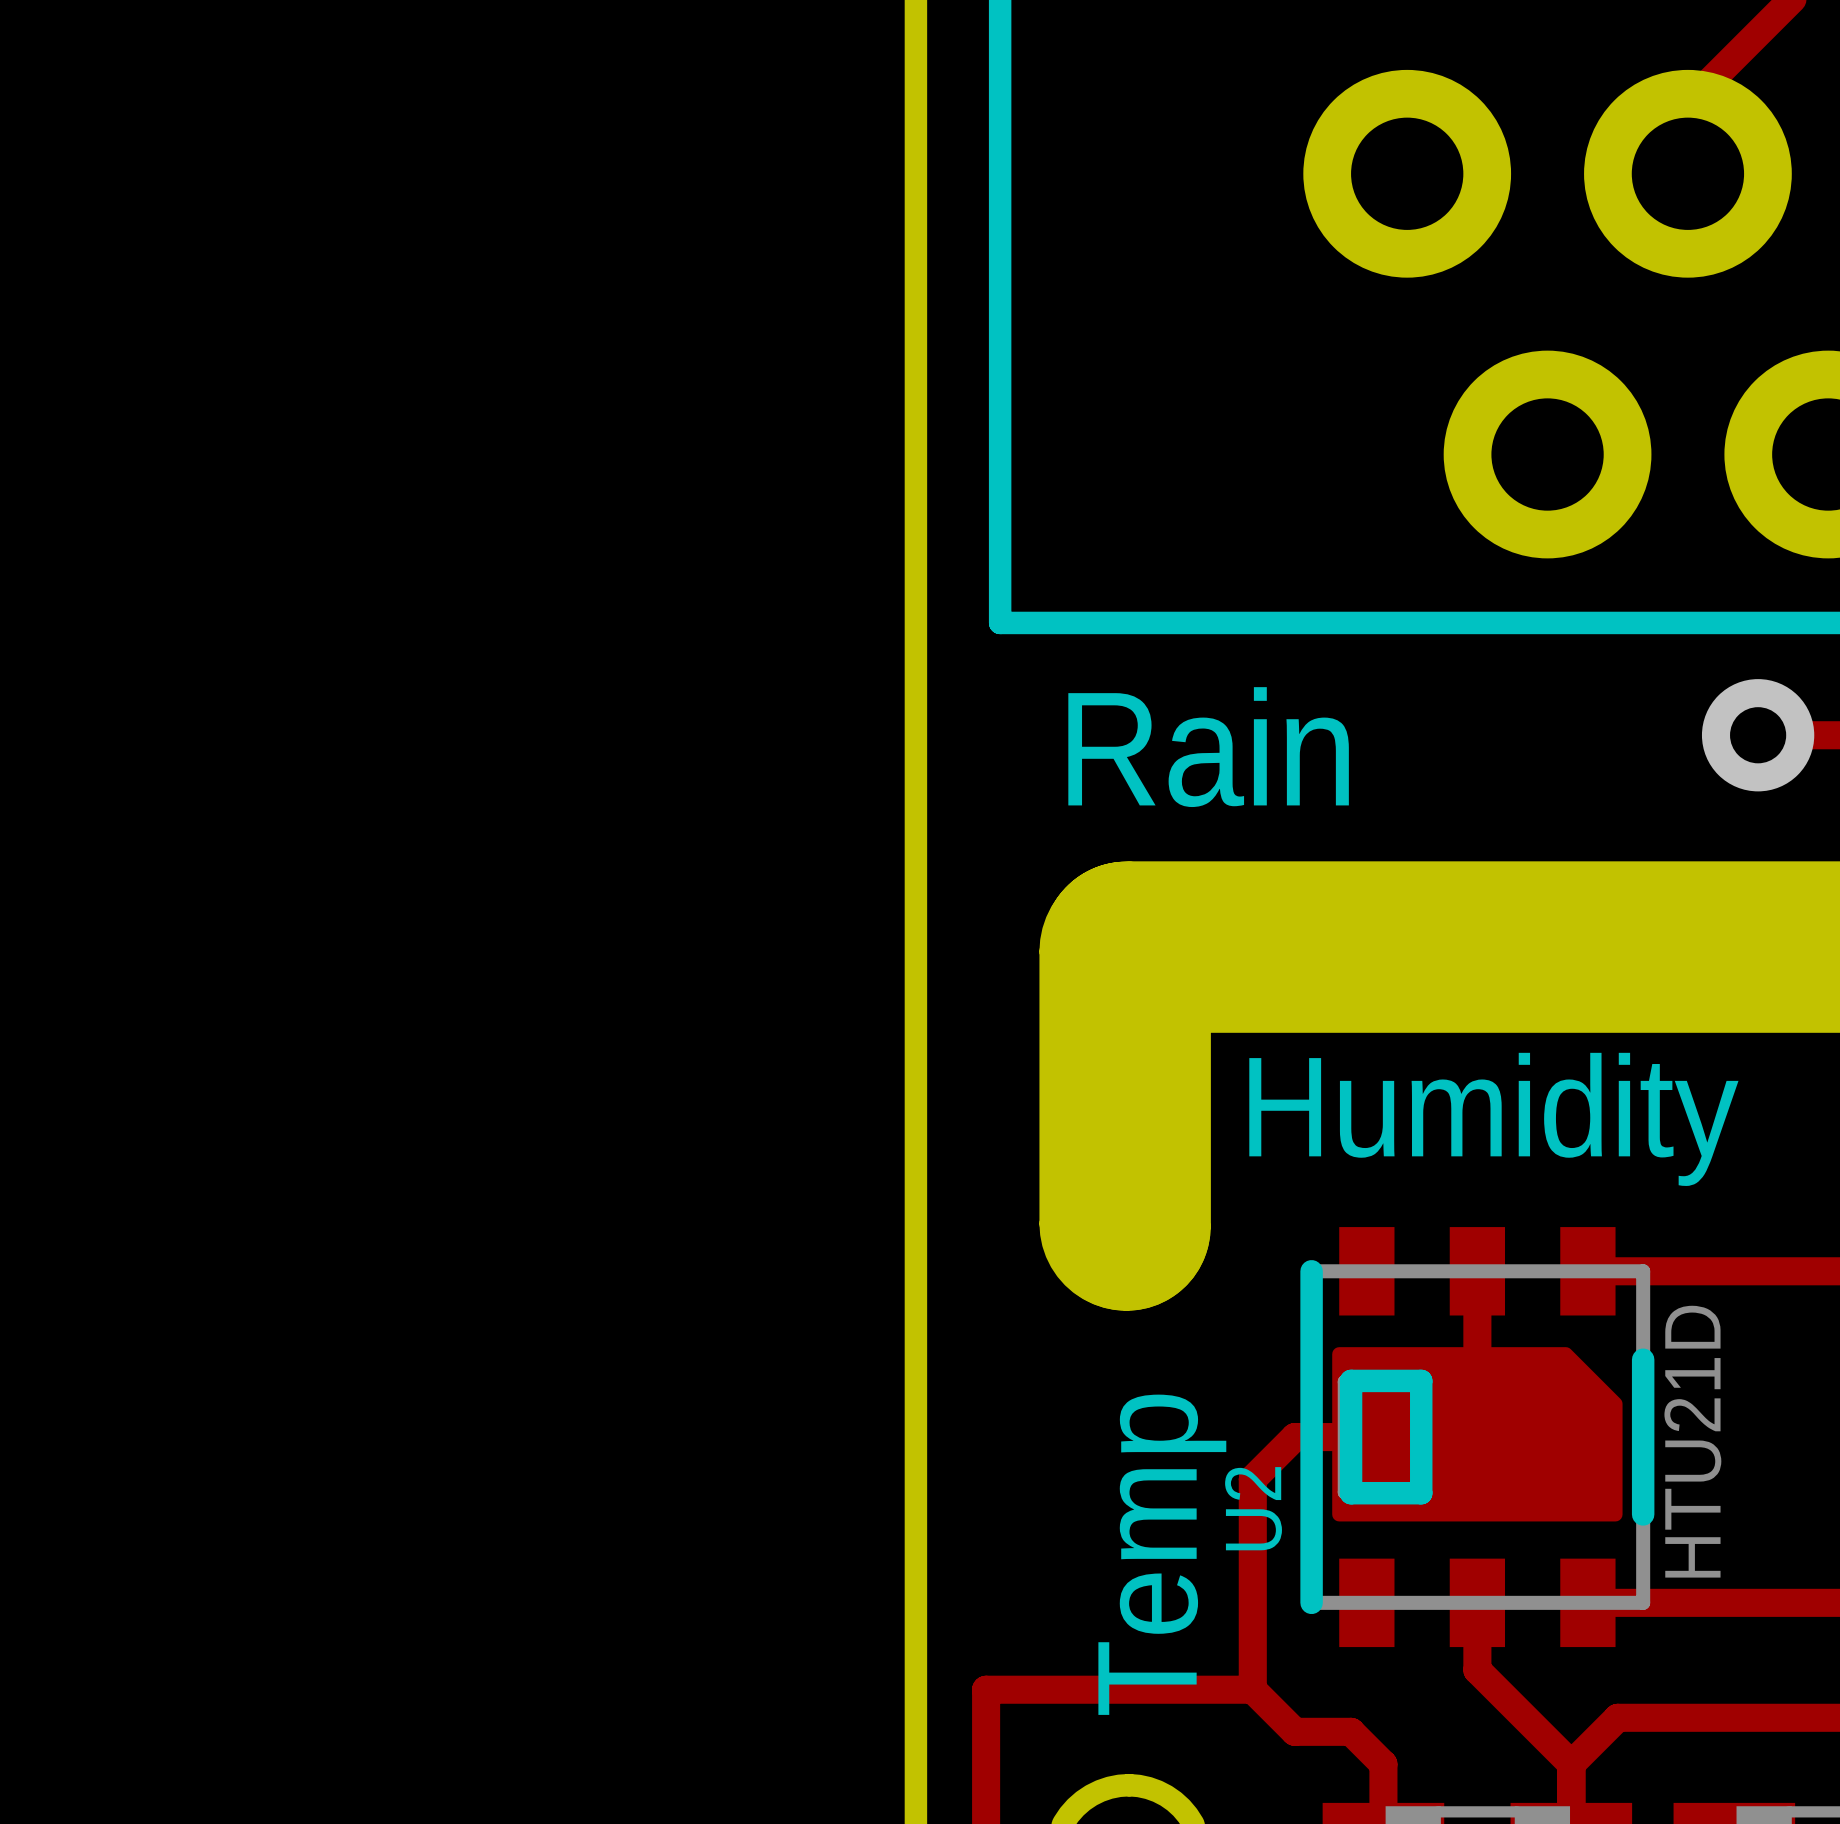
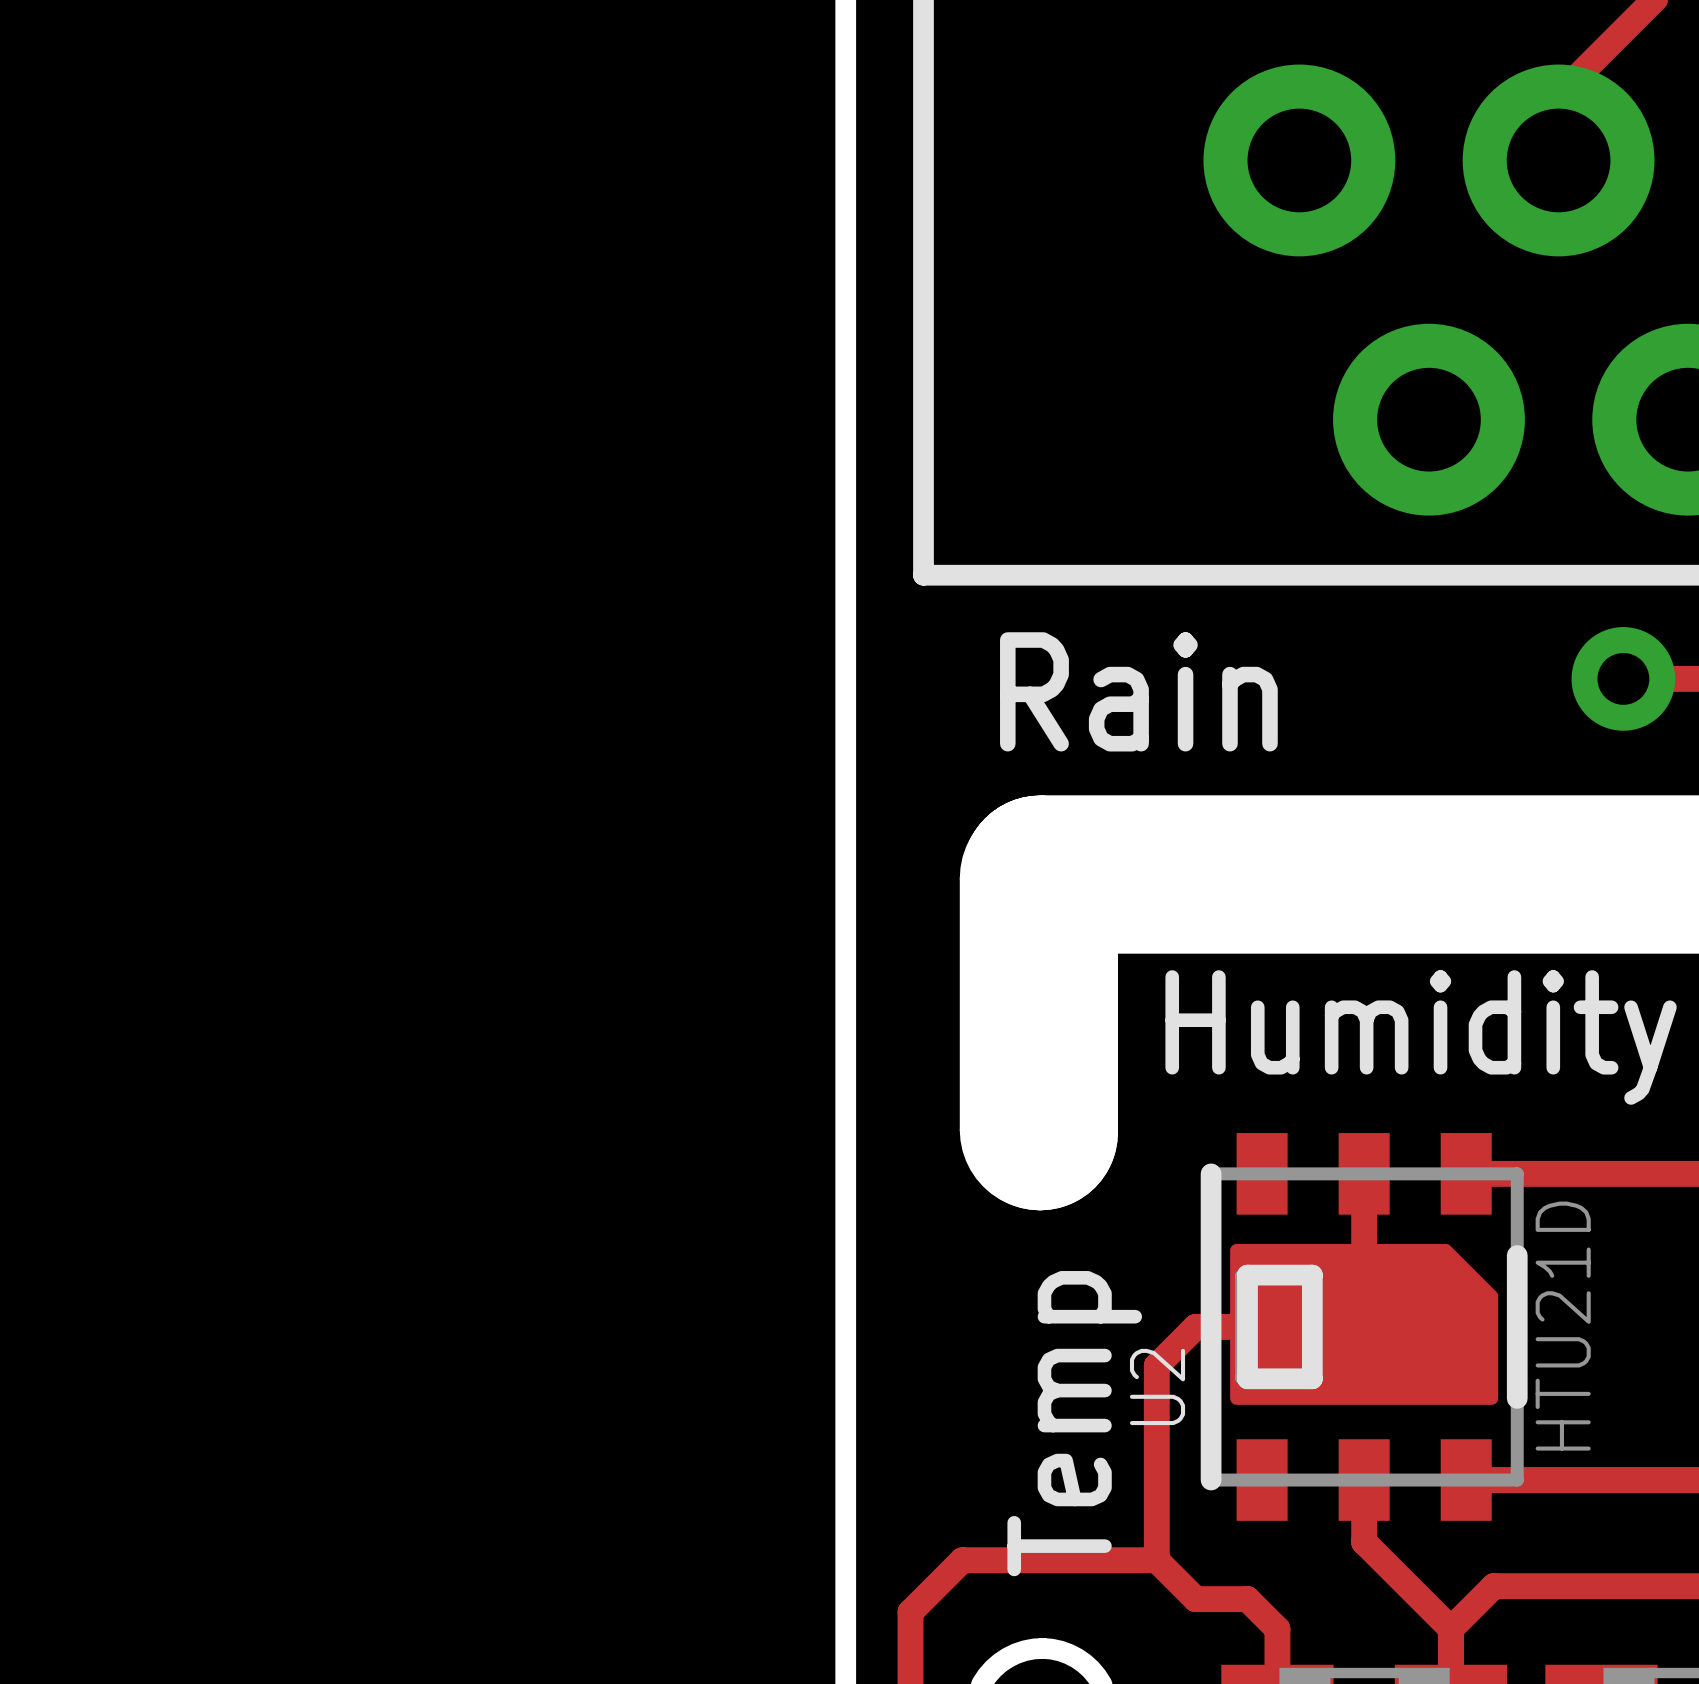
track: (1042, 1689) (986, 1689) (986, 1745) -> (962, 1560) (910, 1612)

